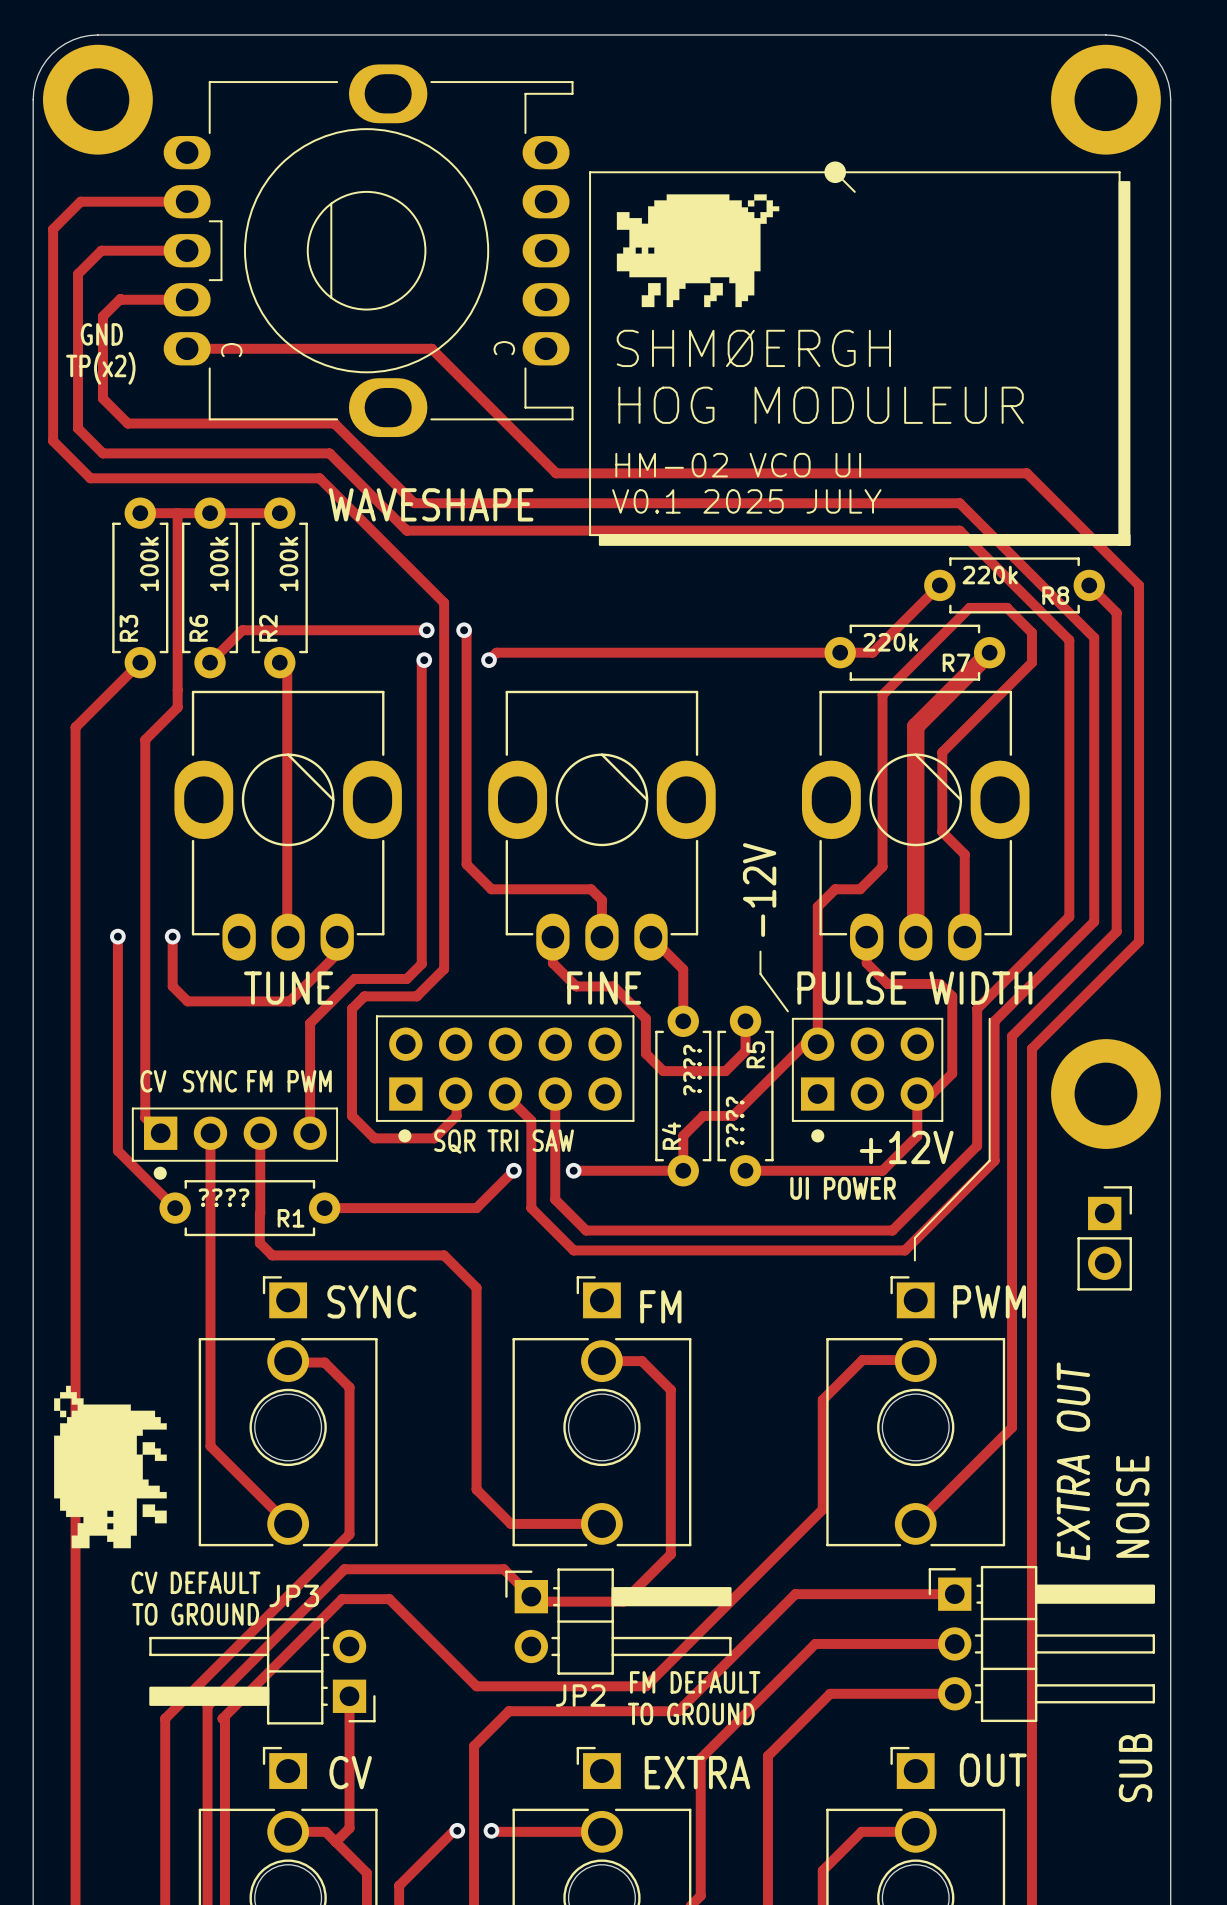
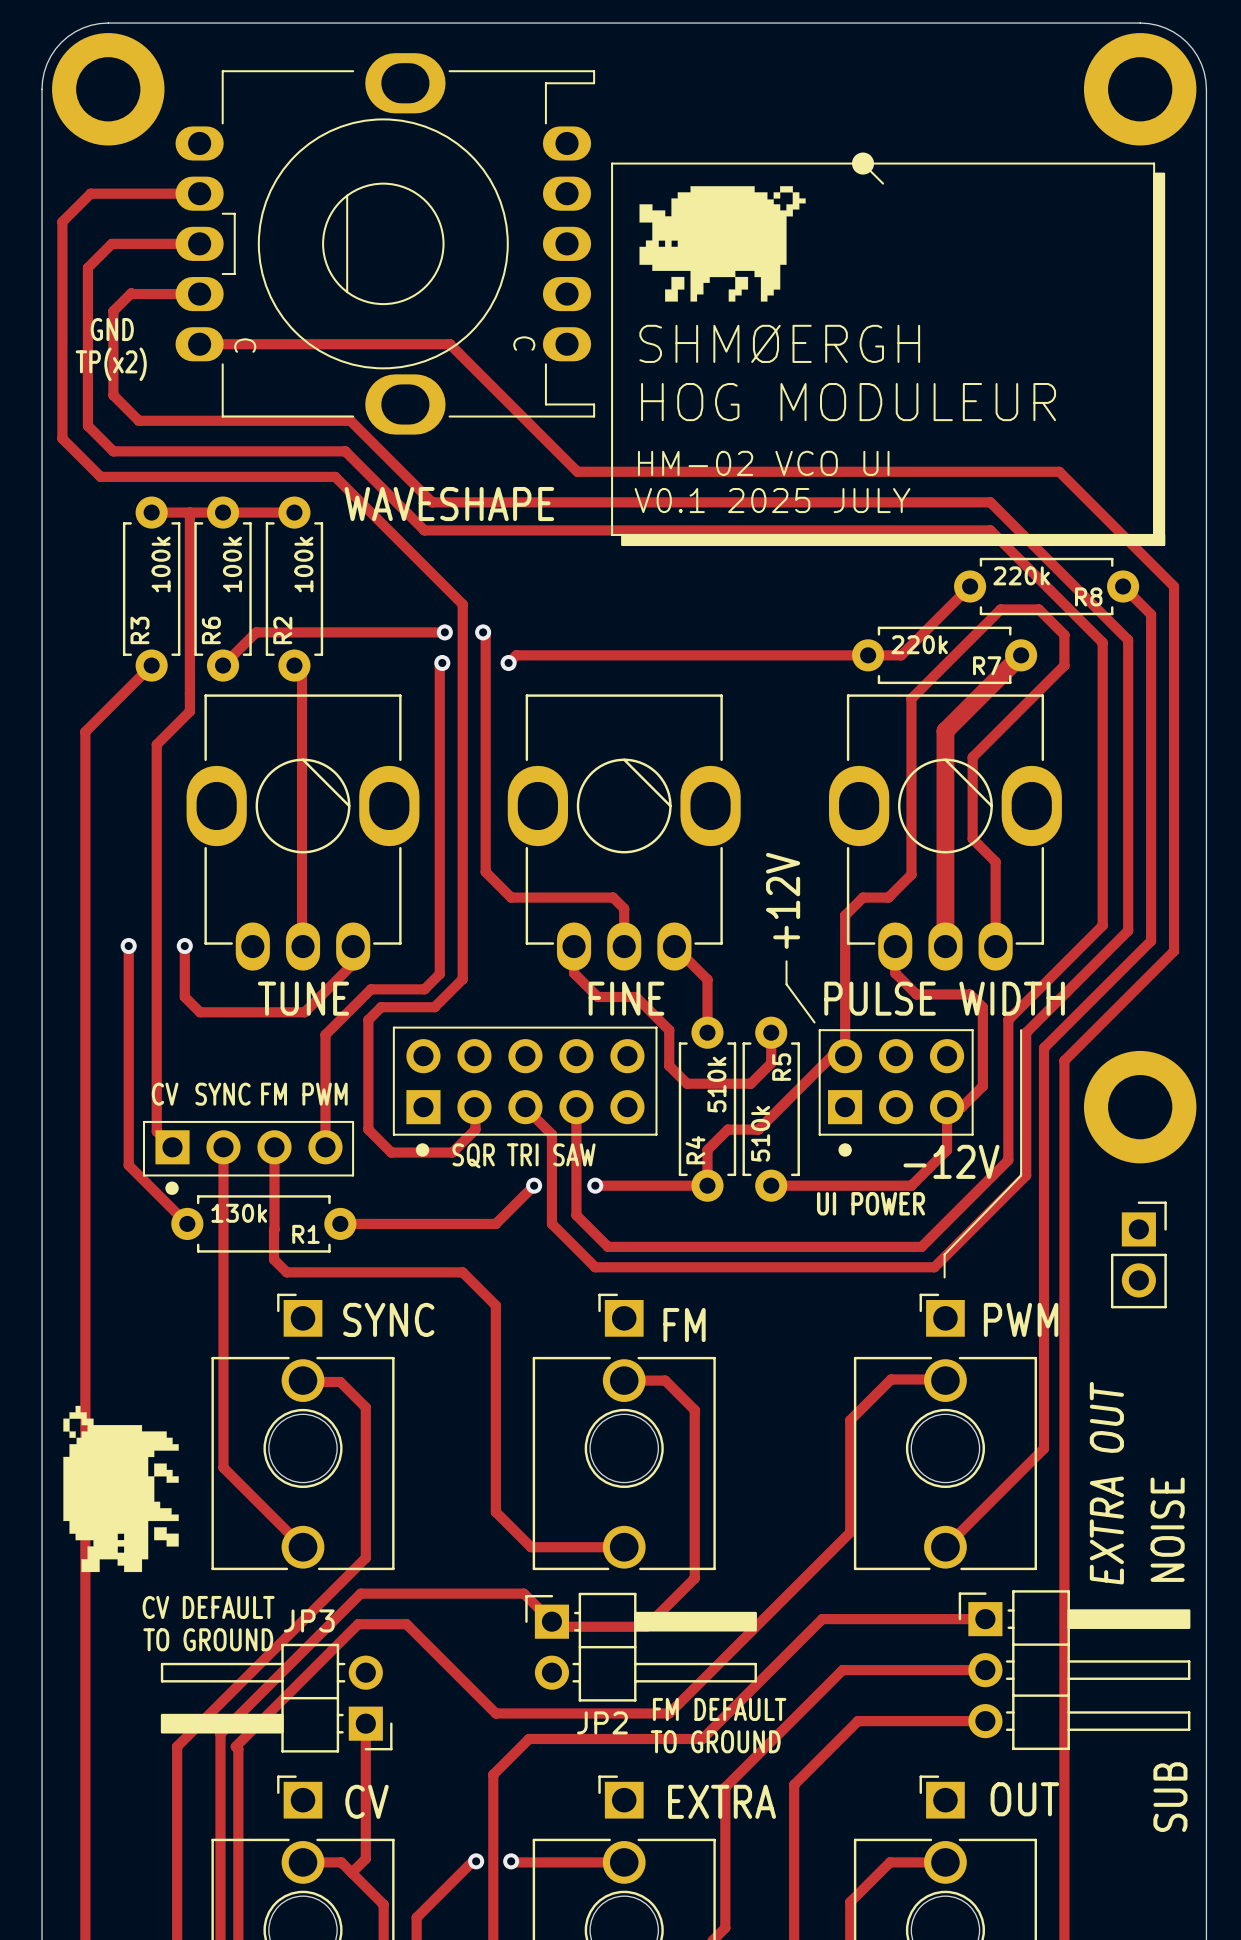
text: -12V (759, 890) -> +12V (783, 900)
R4 value: ???? (692, 1070) -> 510k (716, 1084)
R5 value: ???? (735, 1121) -> 510k (760, 1133)
text: +12V (906, 1147) -> -12V (951, 1161)
R1 value: ???? (224, 1197) -> 130k (239, 1213)

